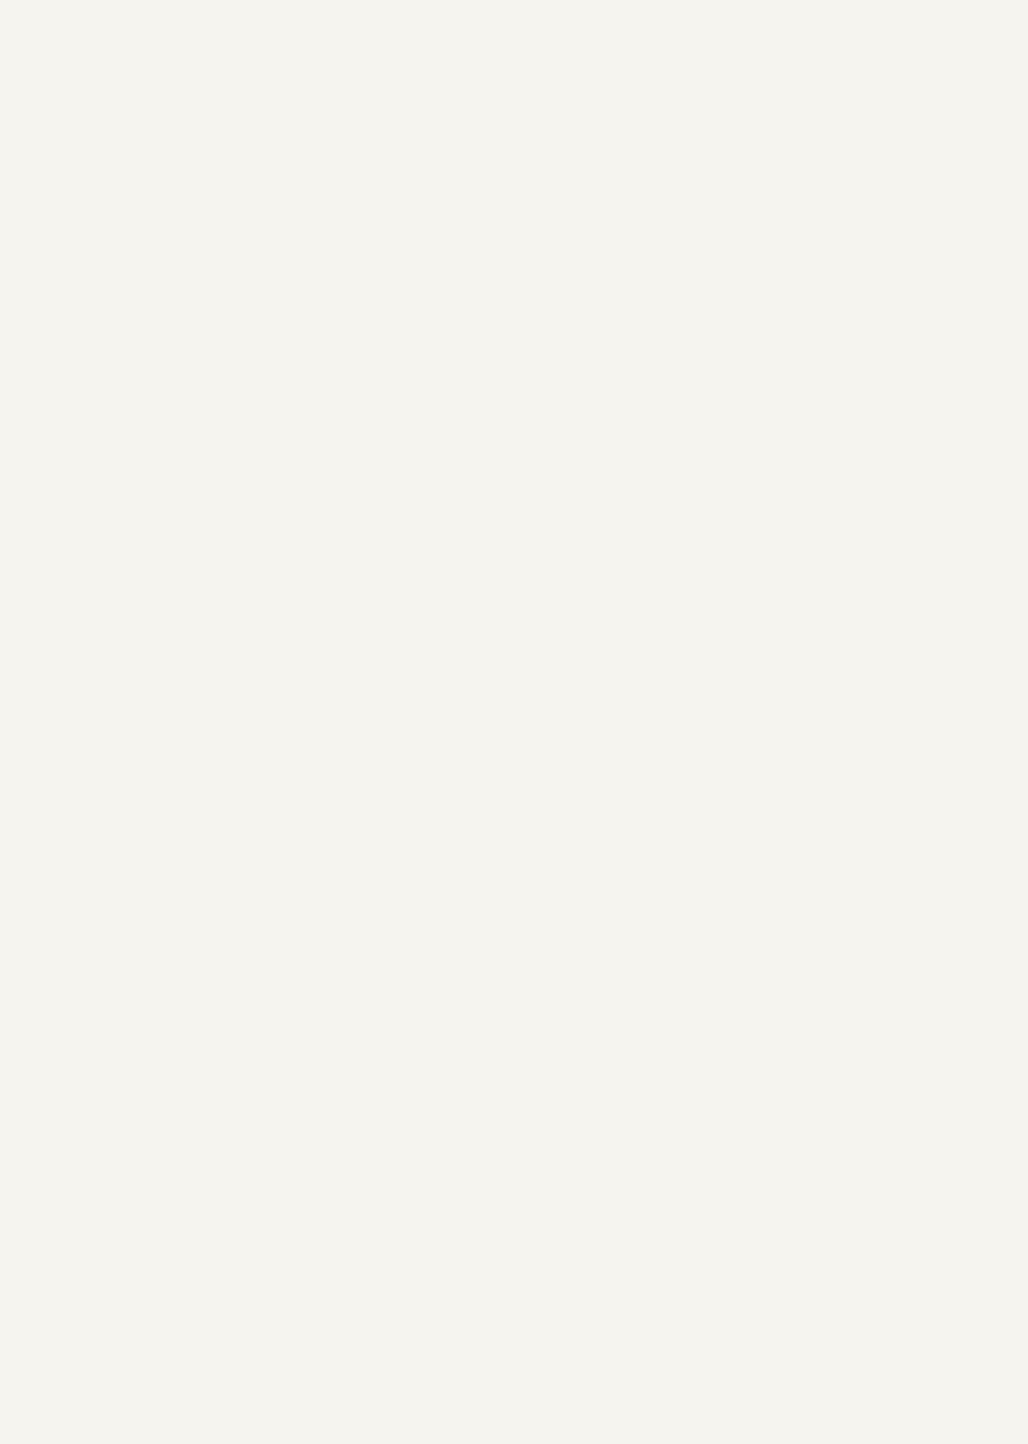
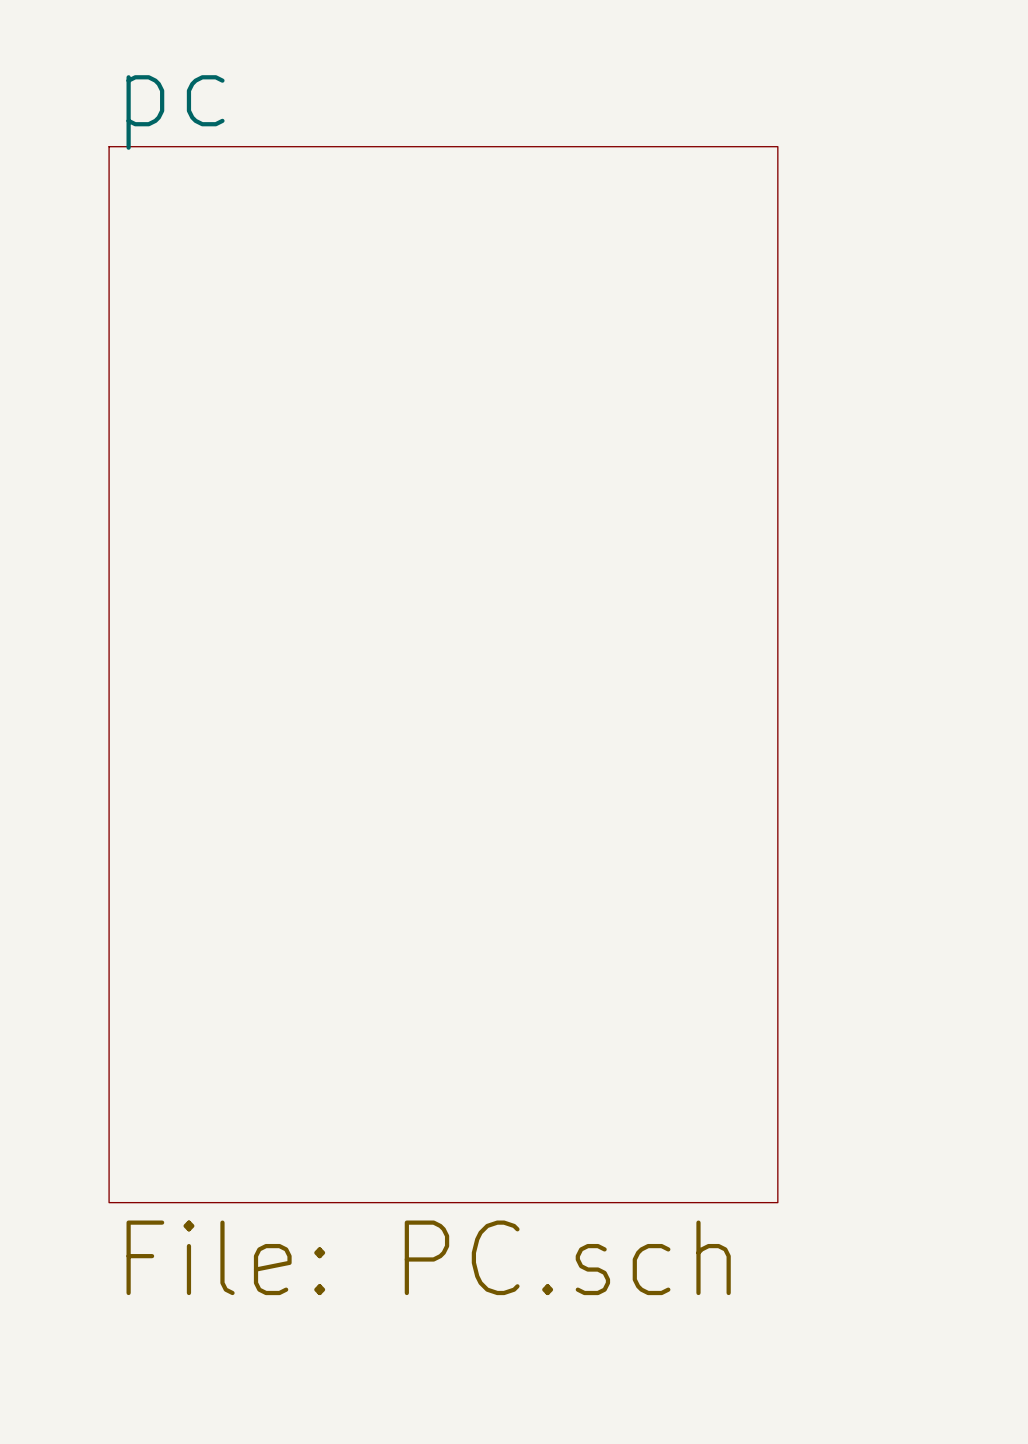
sheet pc: none -> File: PC.sch (443, 674)

